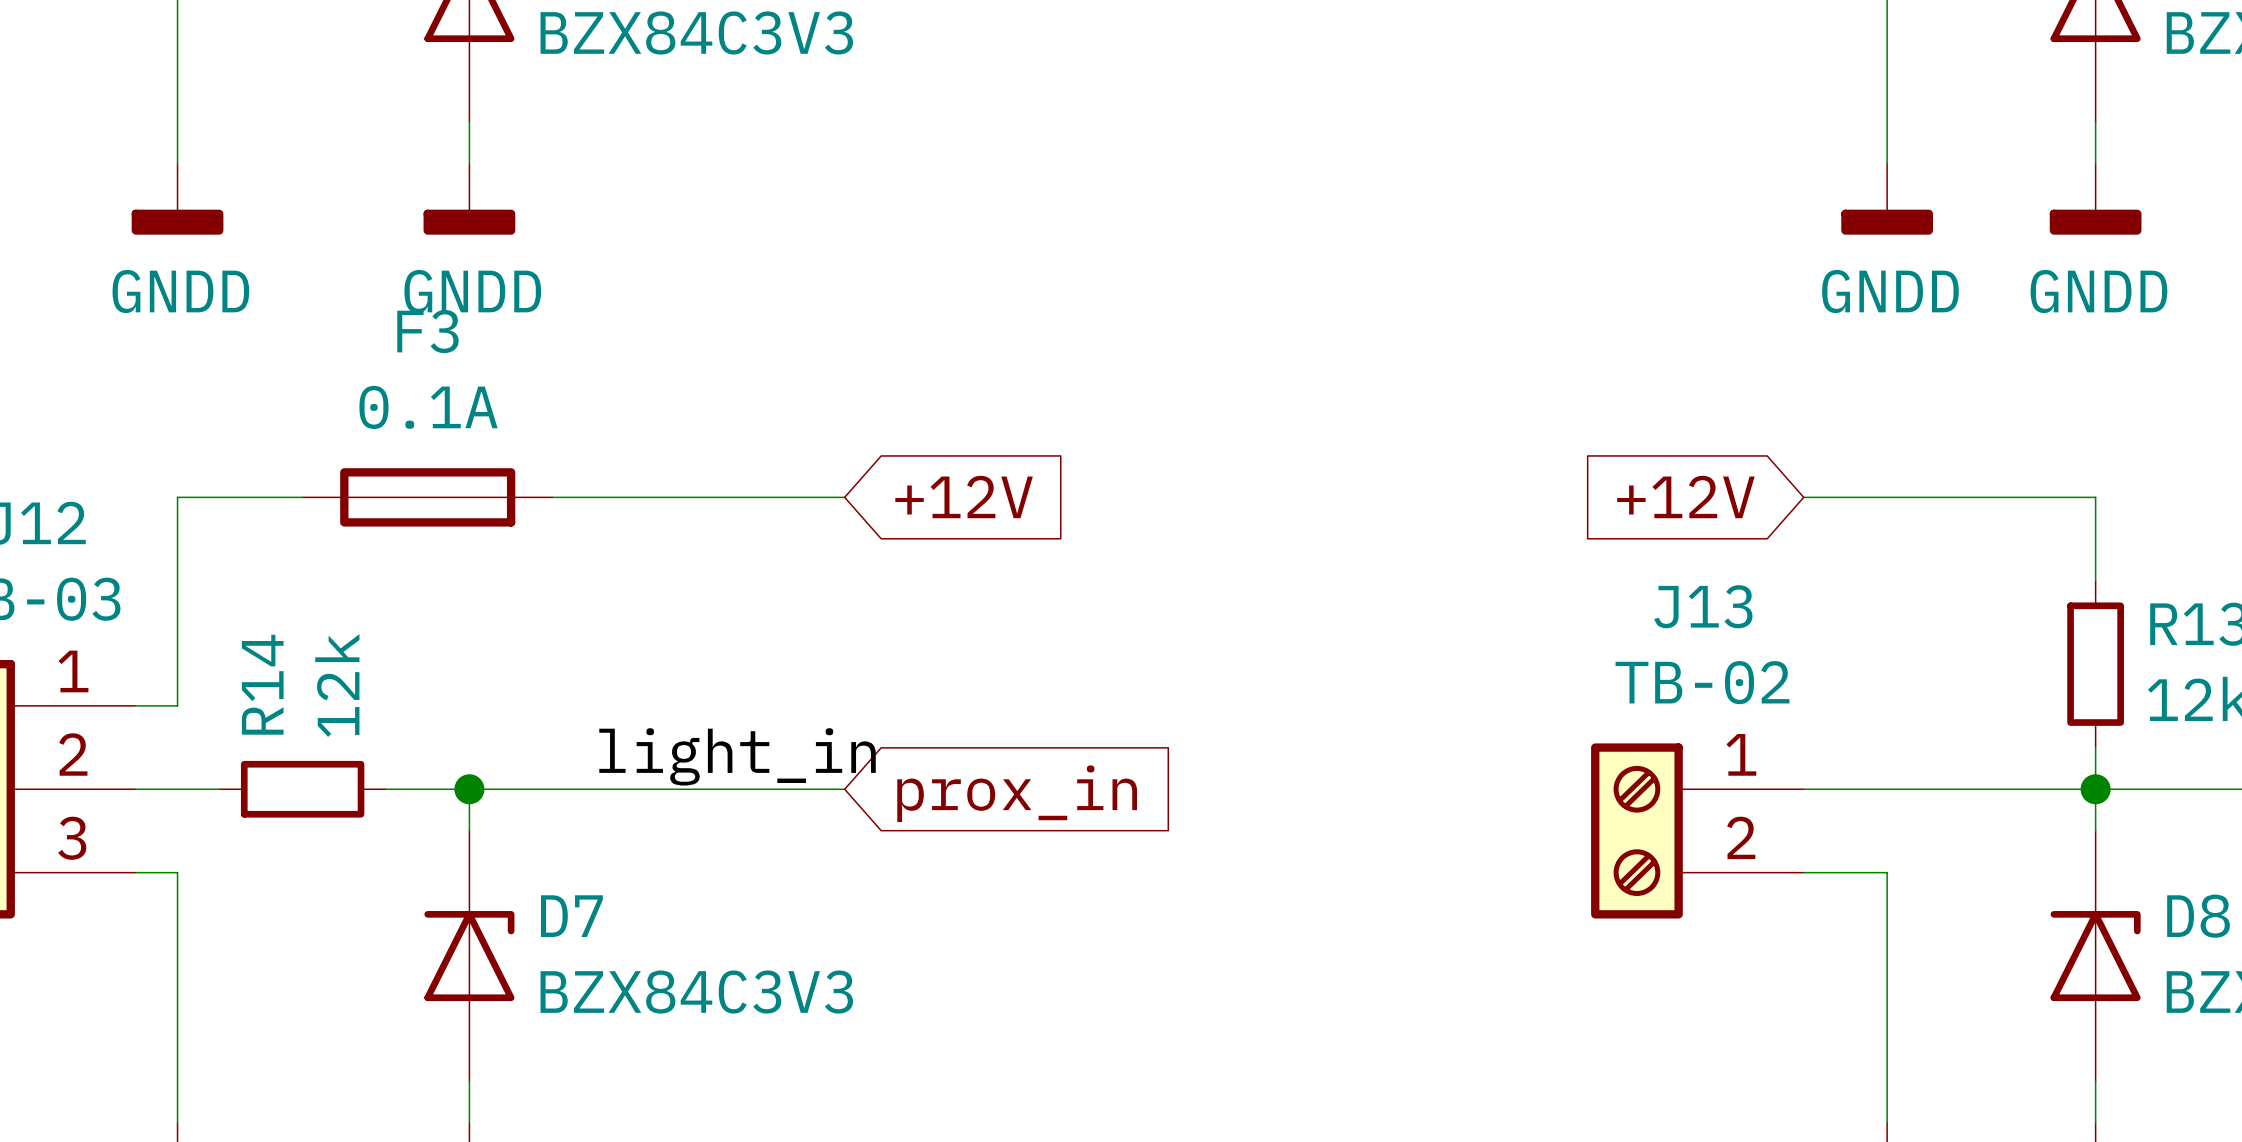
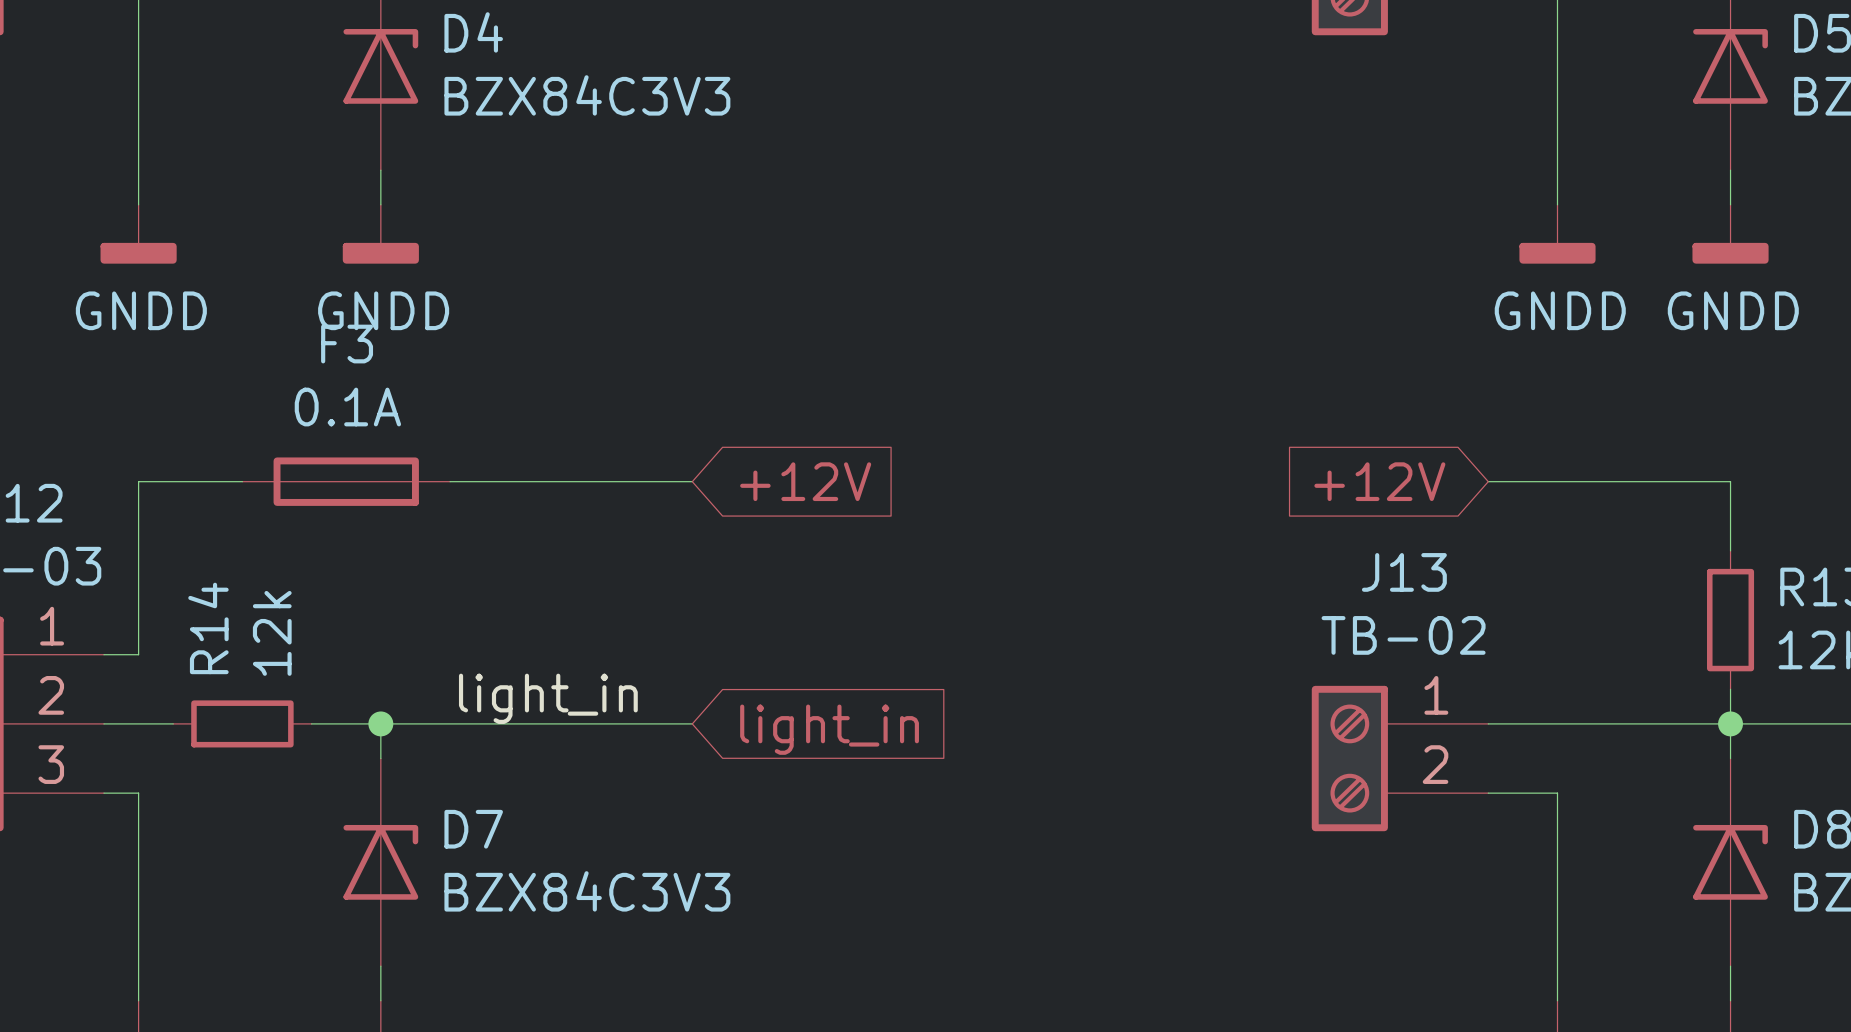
label position: light_in (737, 756) -> light_in (548, 698)
global label: prox_in (1017, 793) -> light_in (829, 729)

